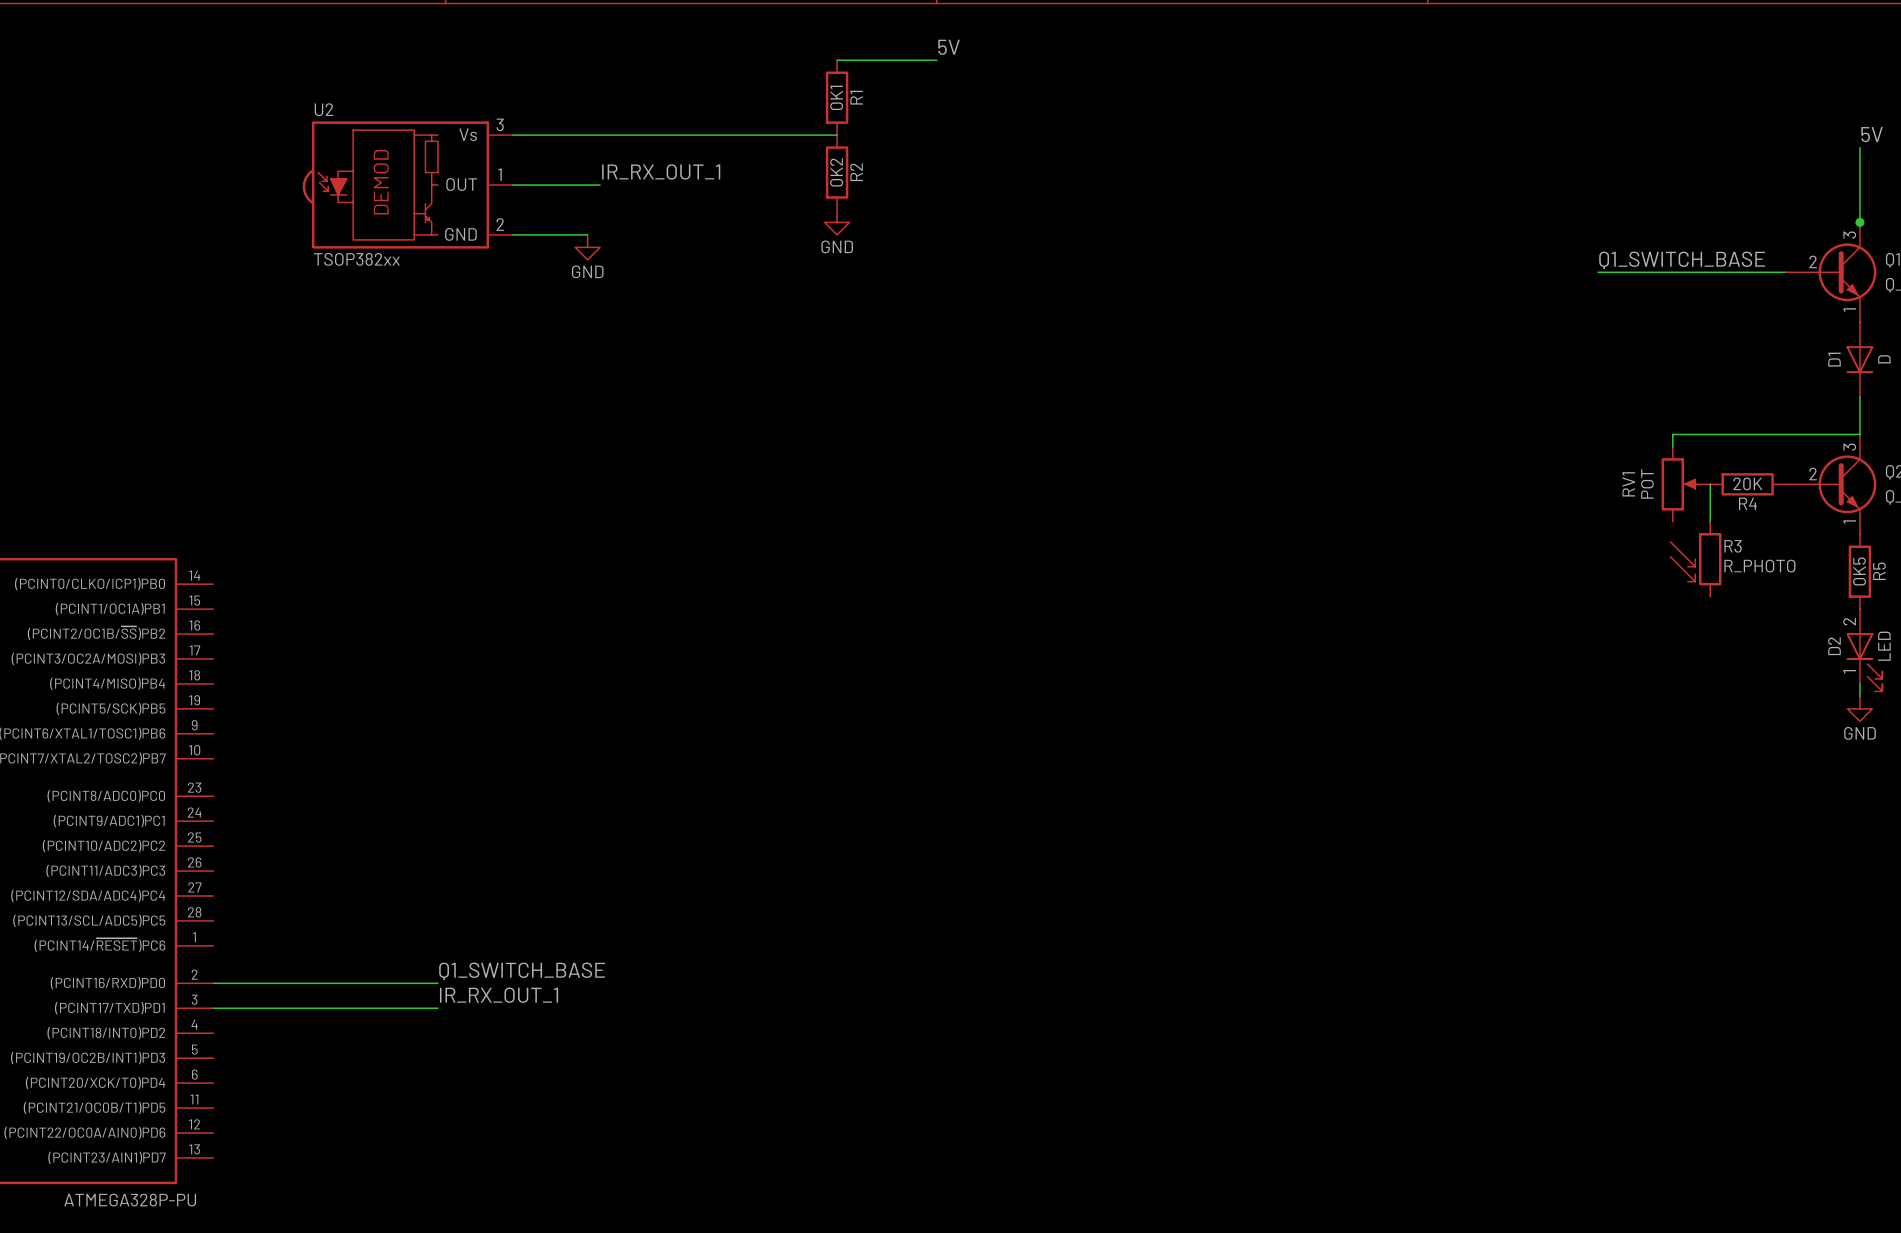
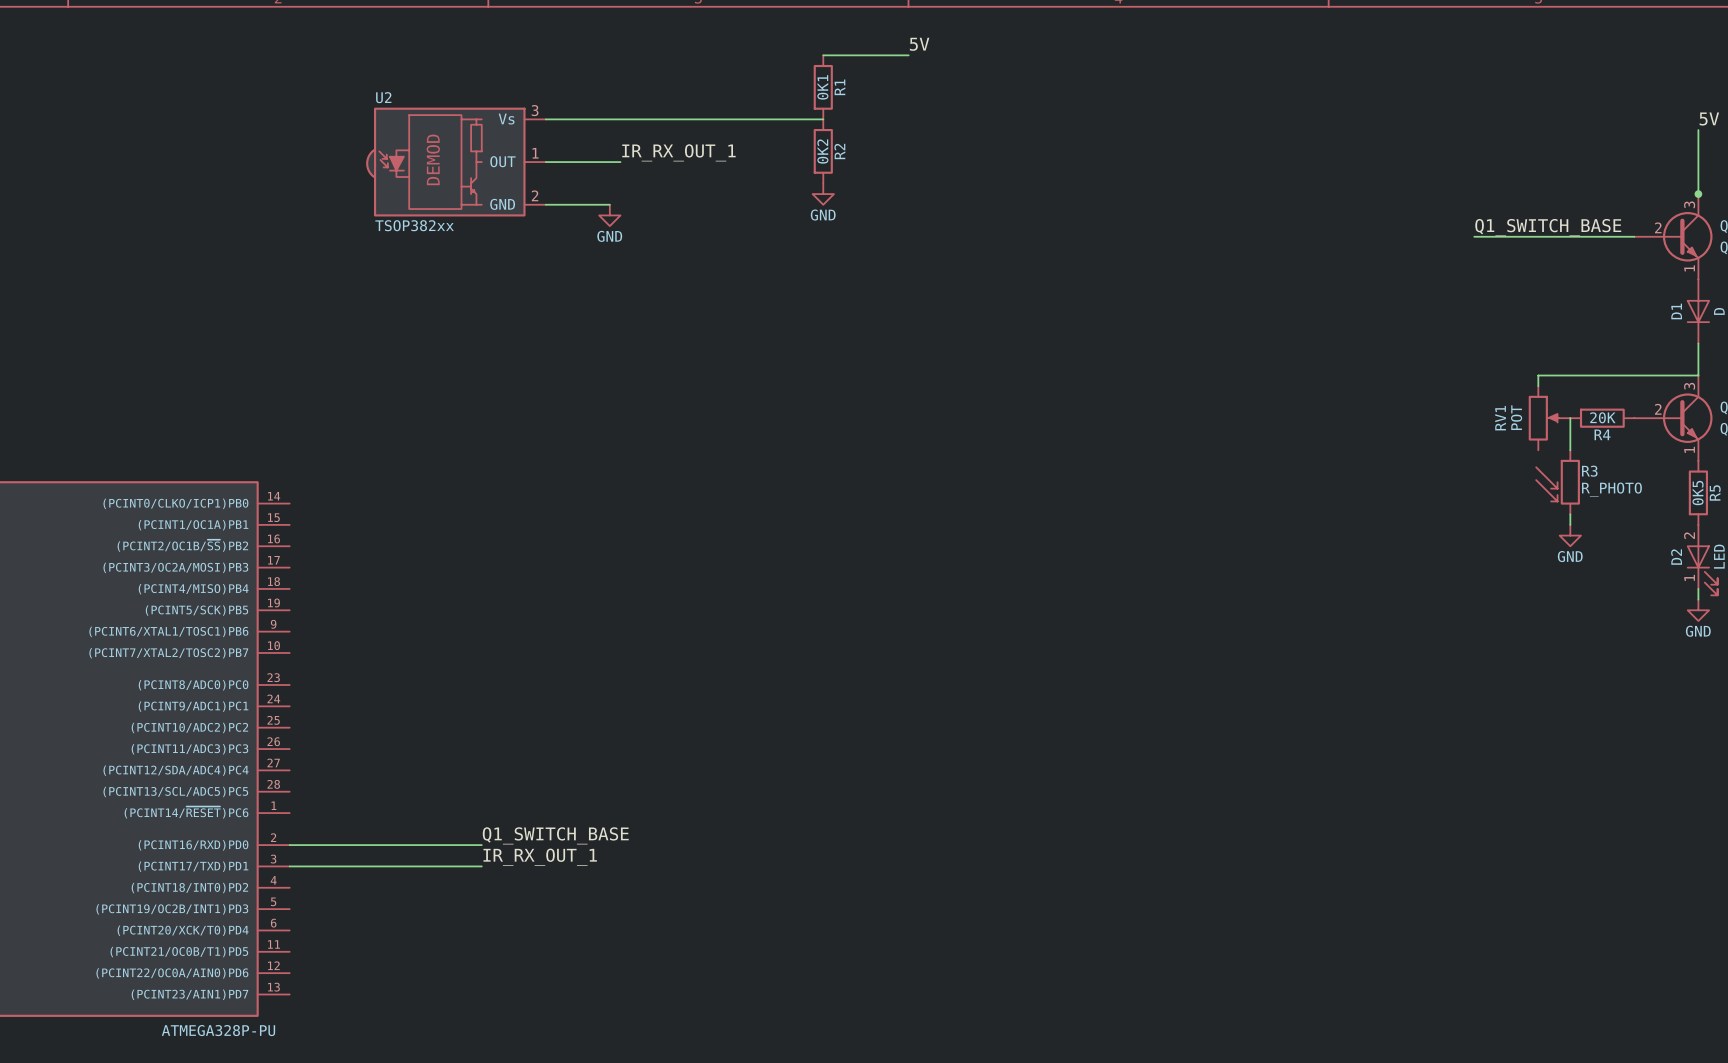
wire: none -> (1570, 514) (1570, 524)
power symbol: none -> GND (1570, 535)

